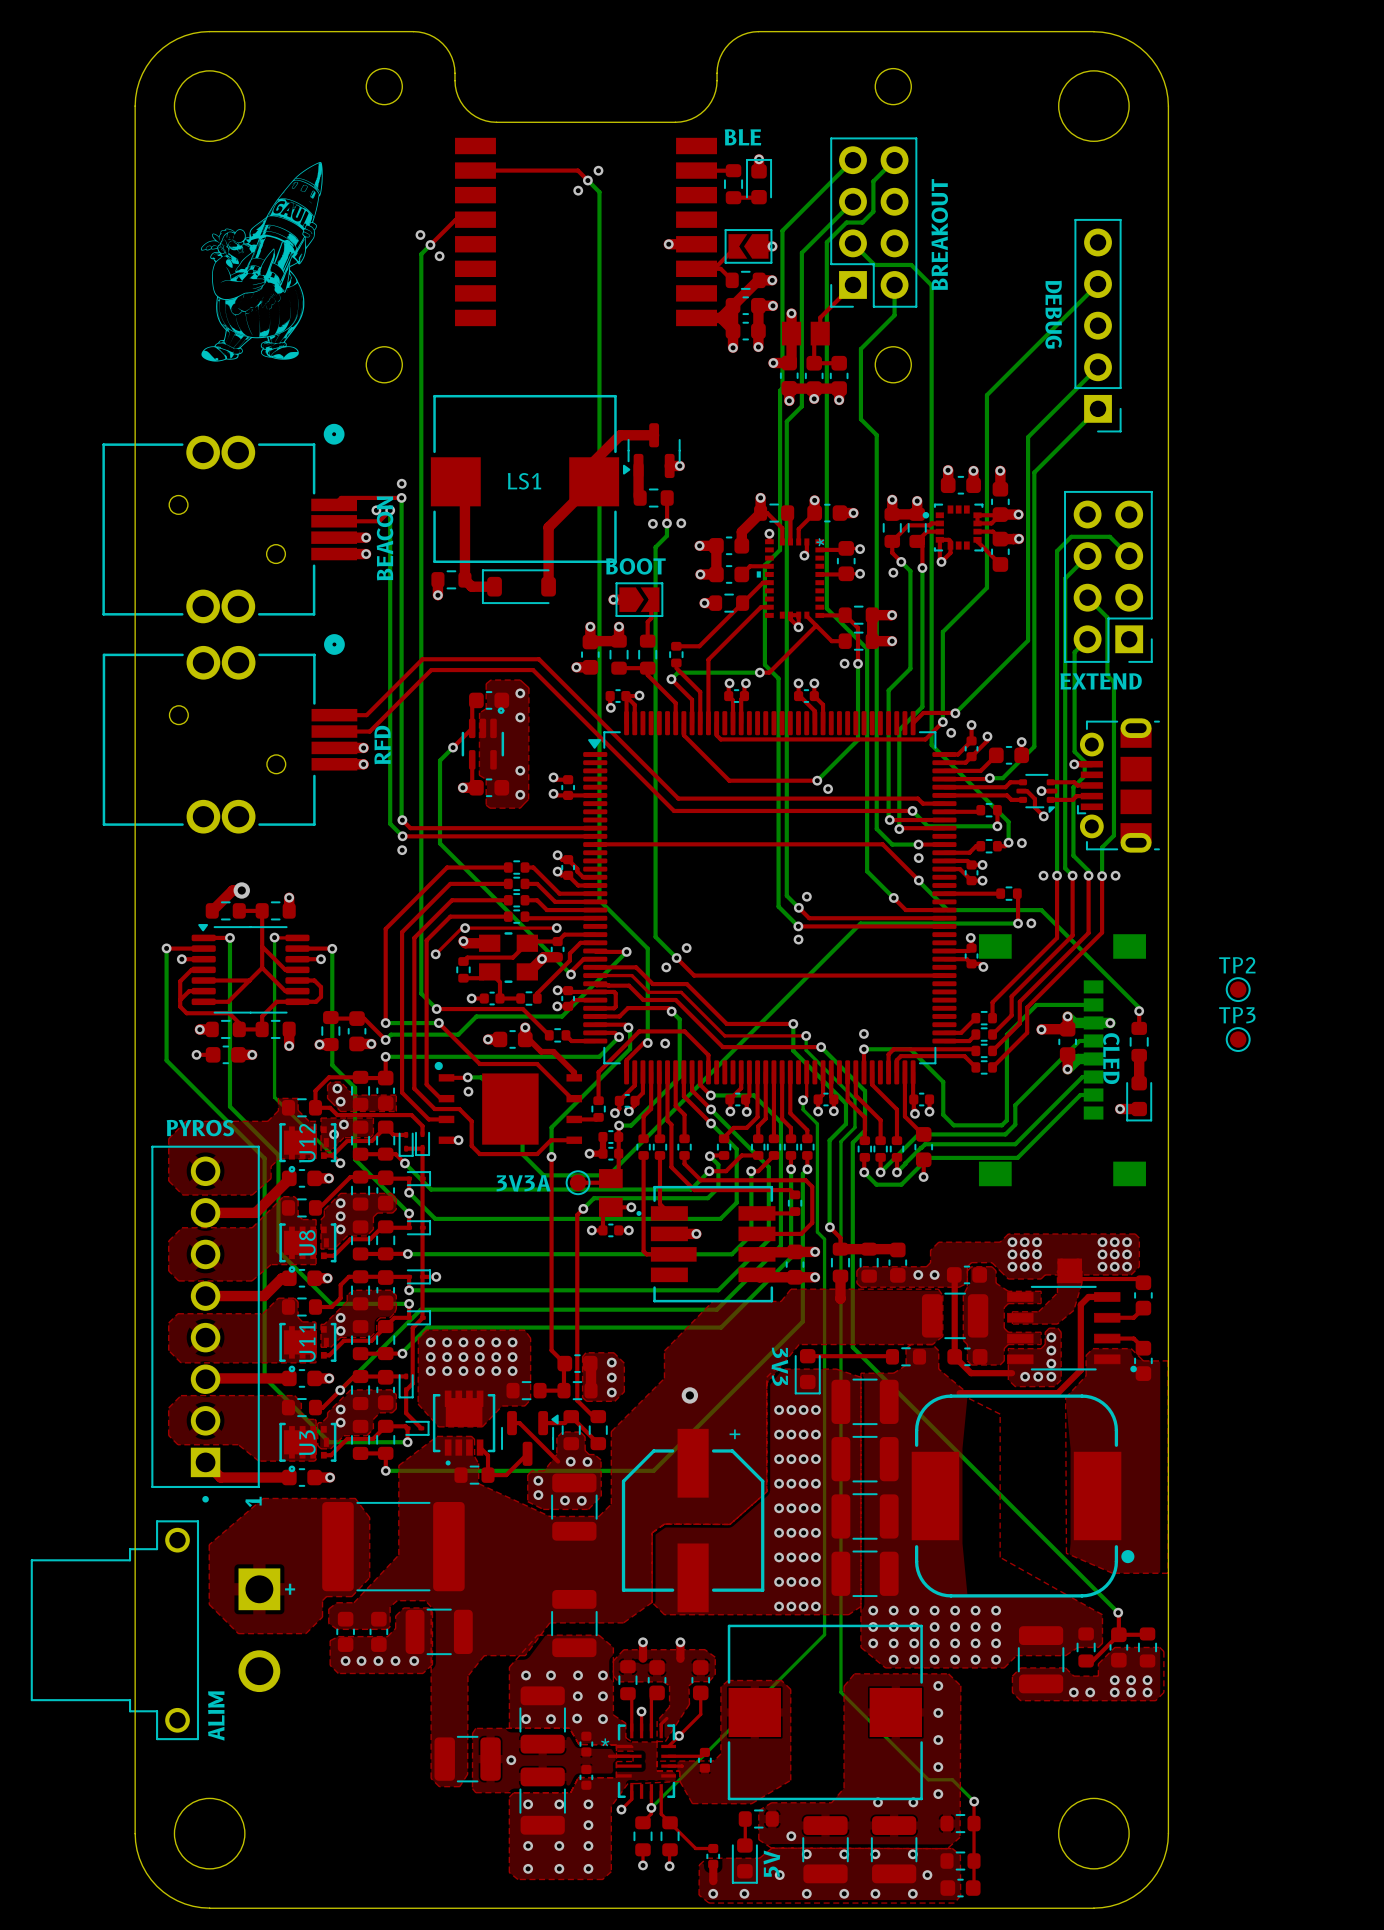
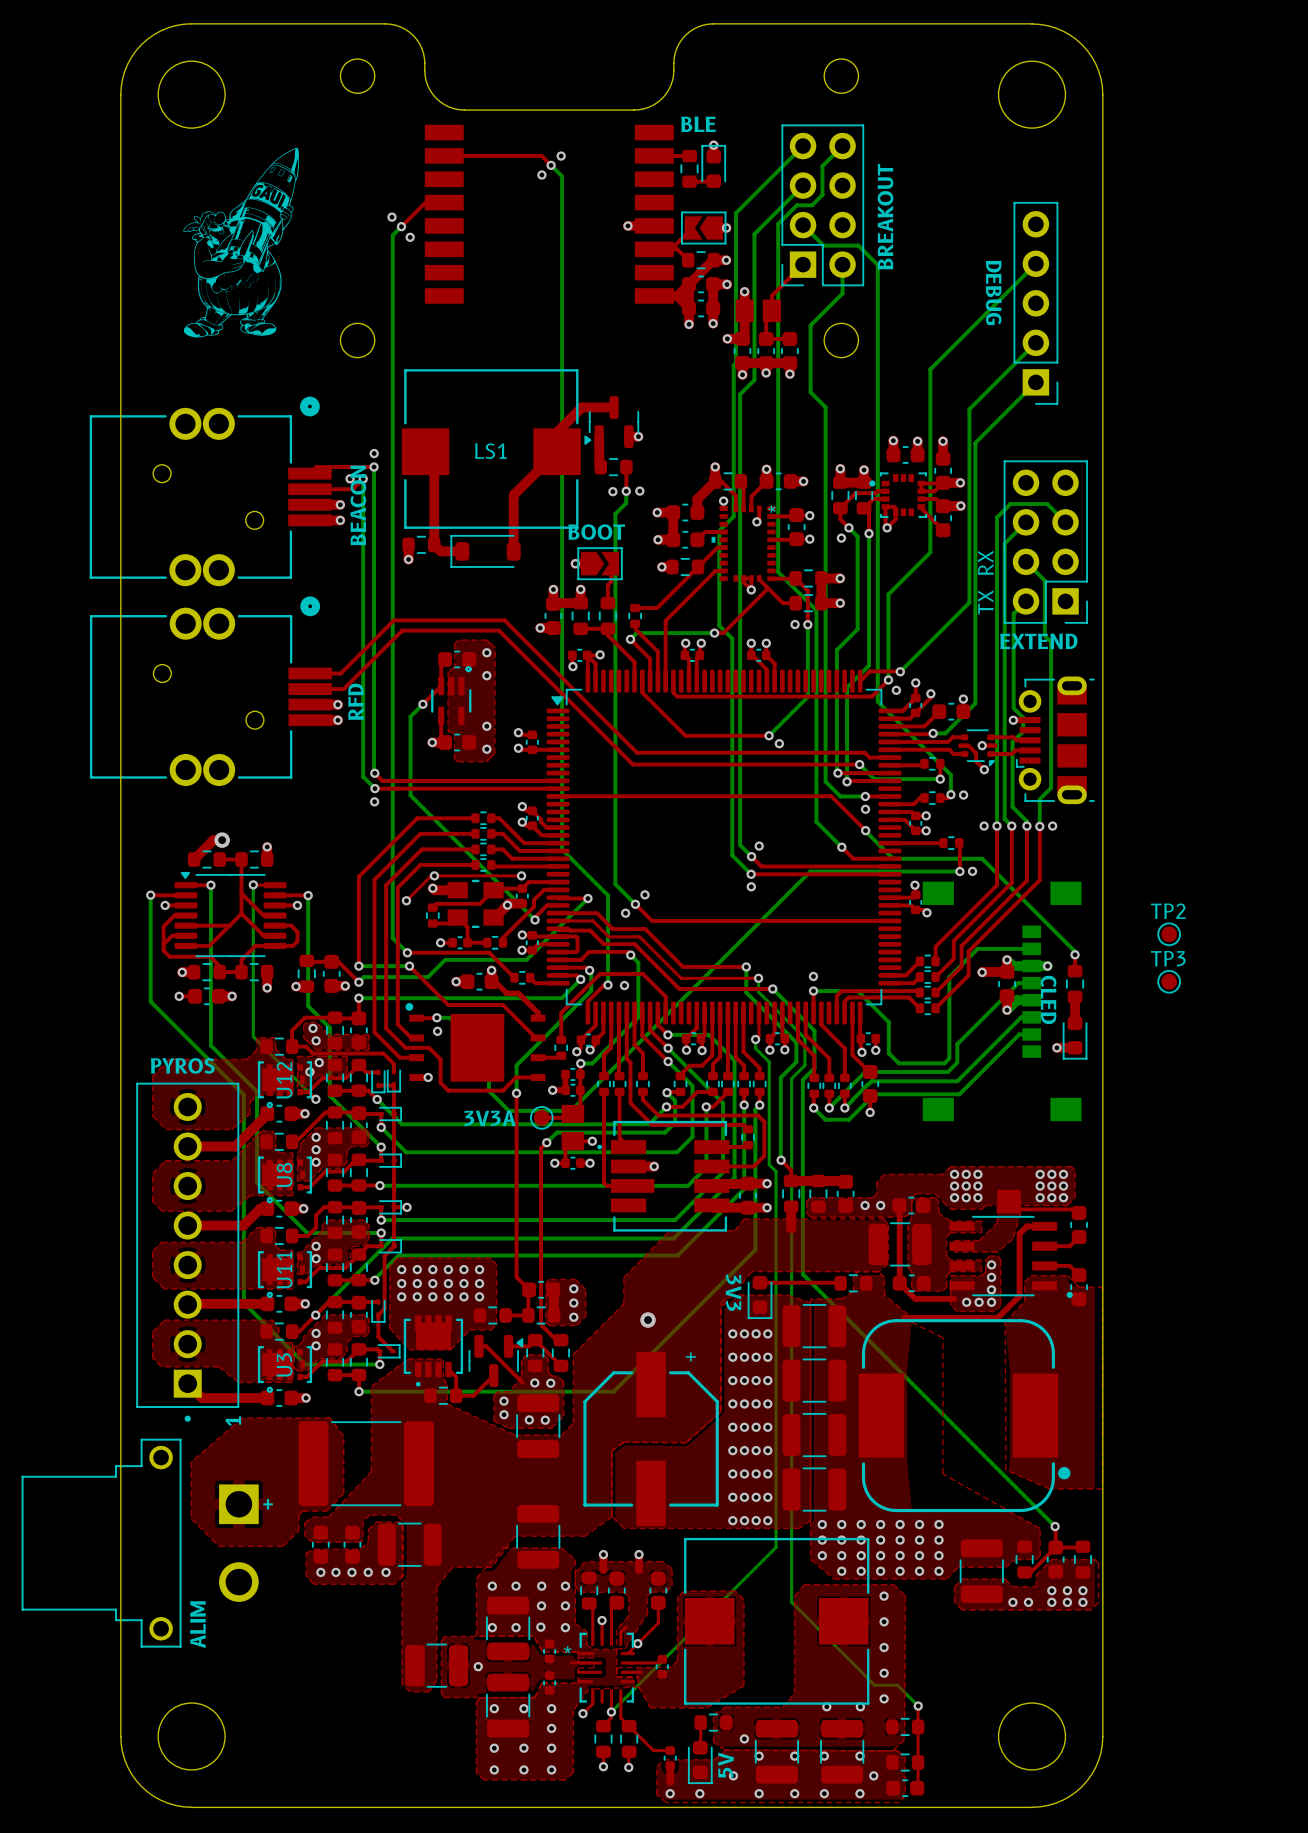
text: none -> RX (985, 562)
text: none -> TX (985, 602)

